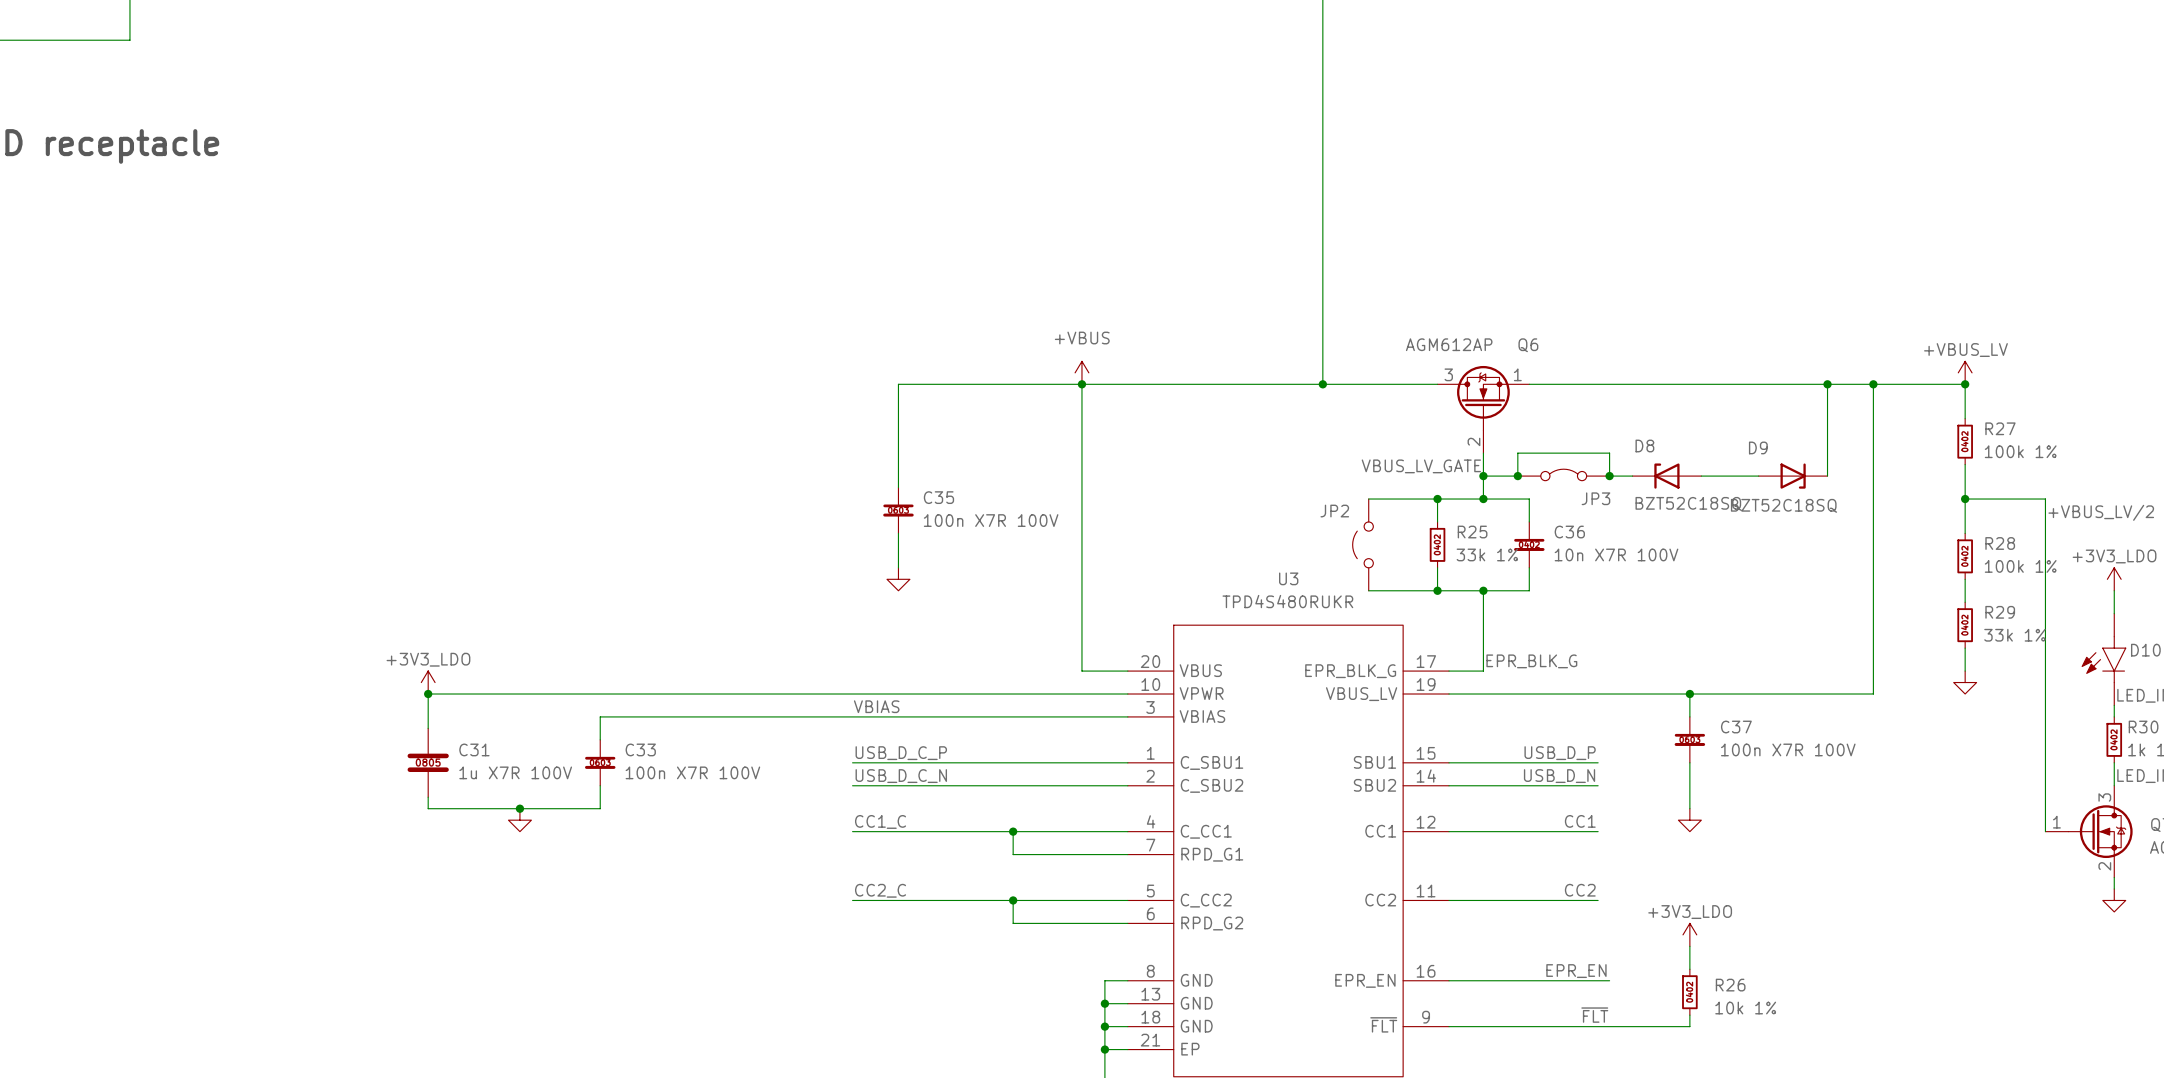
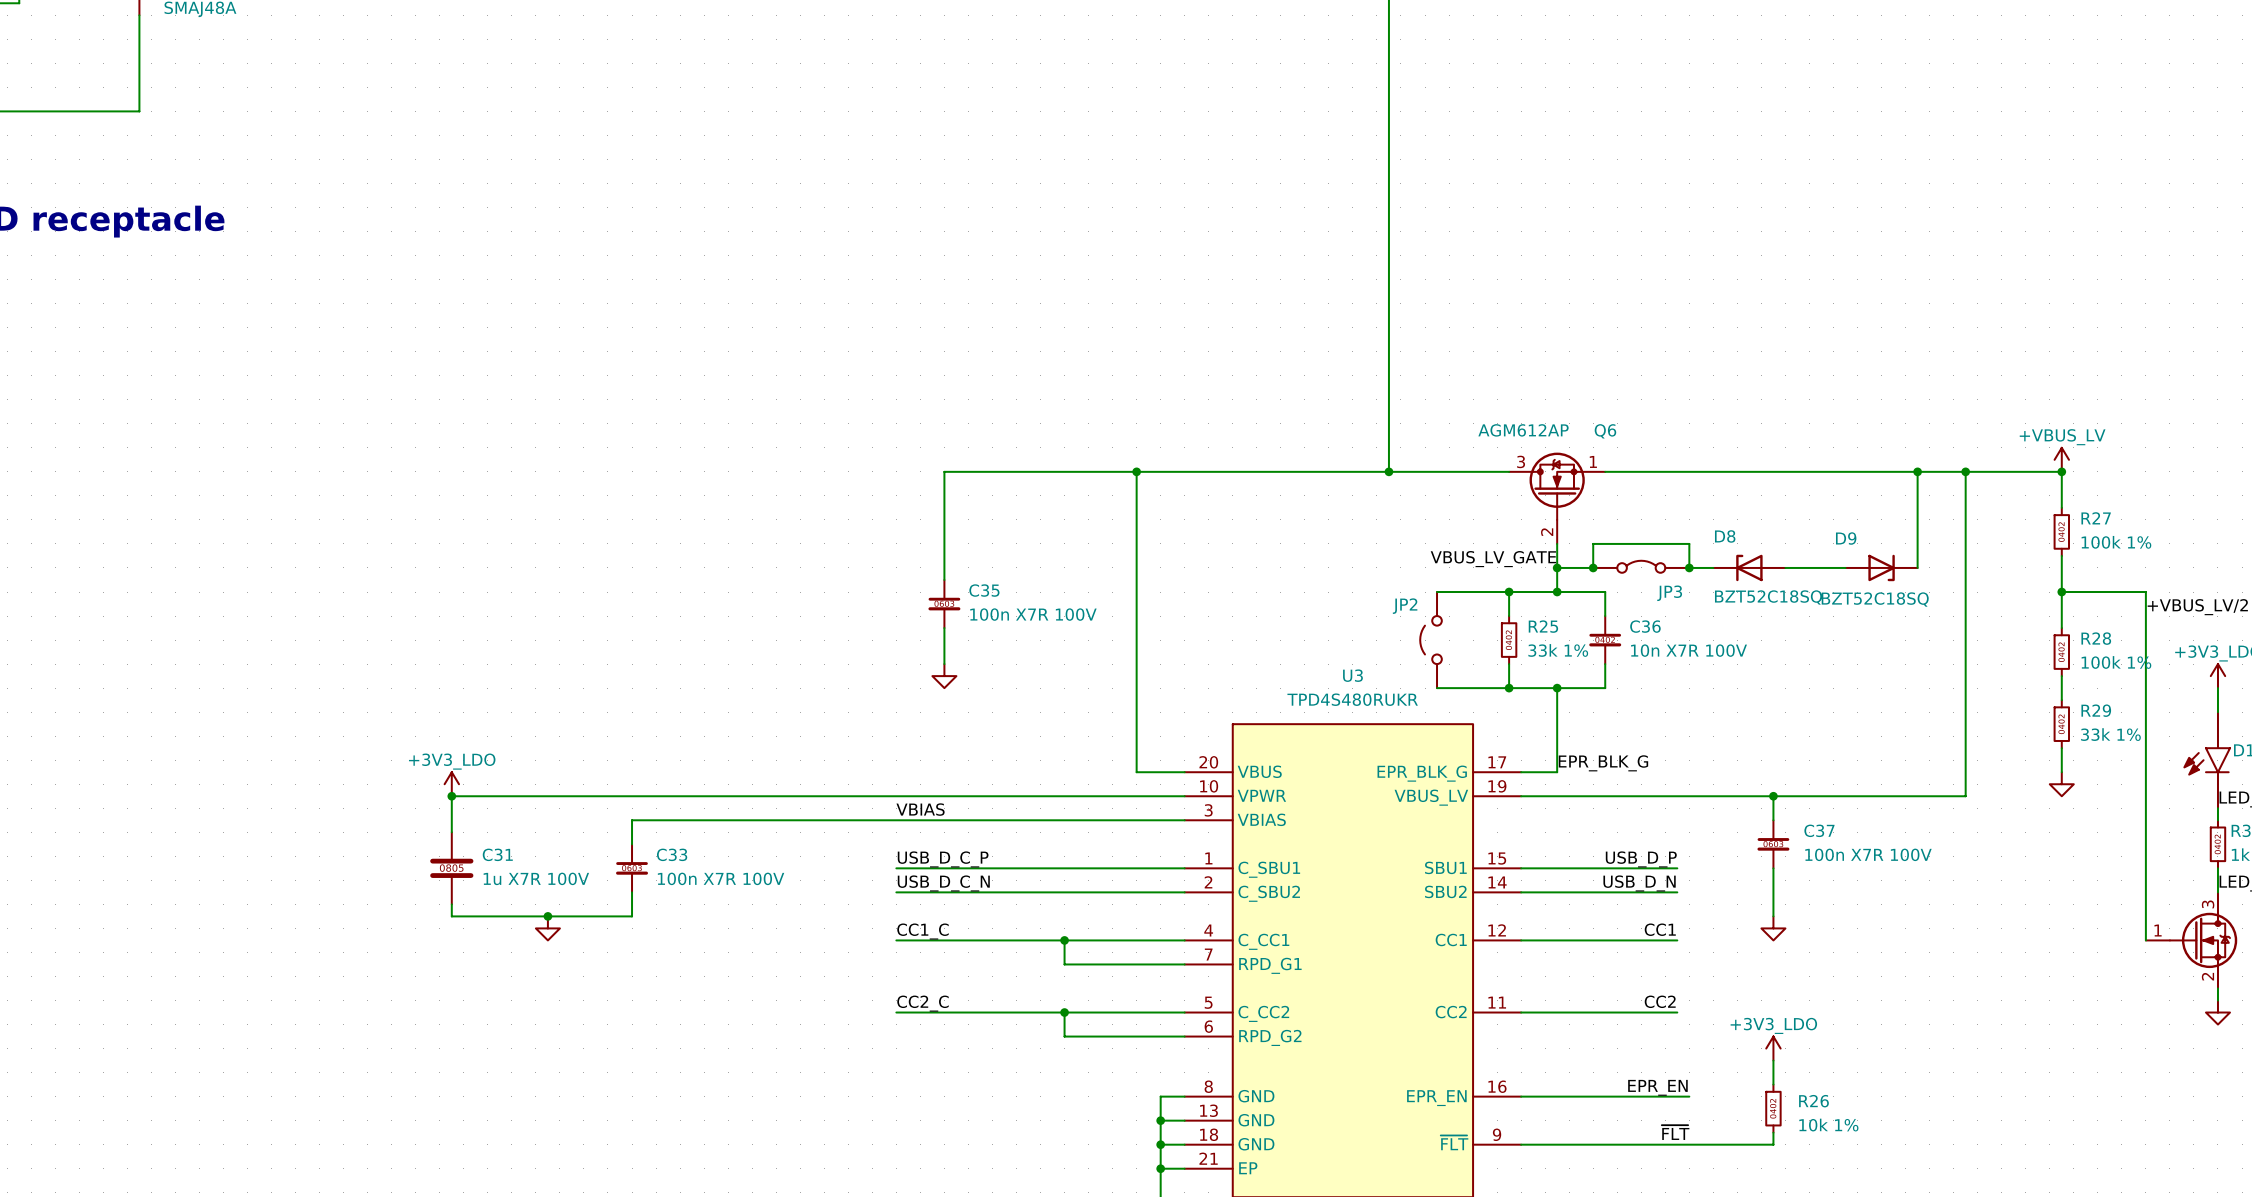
power symbol: +VBUS (1081, 372) -> none

